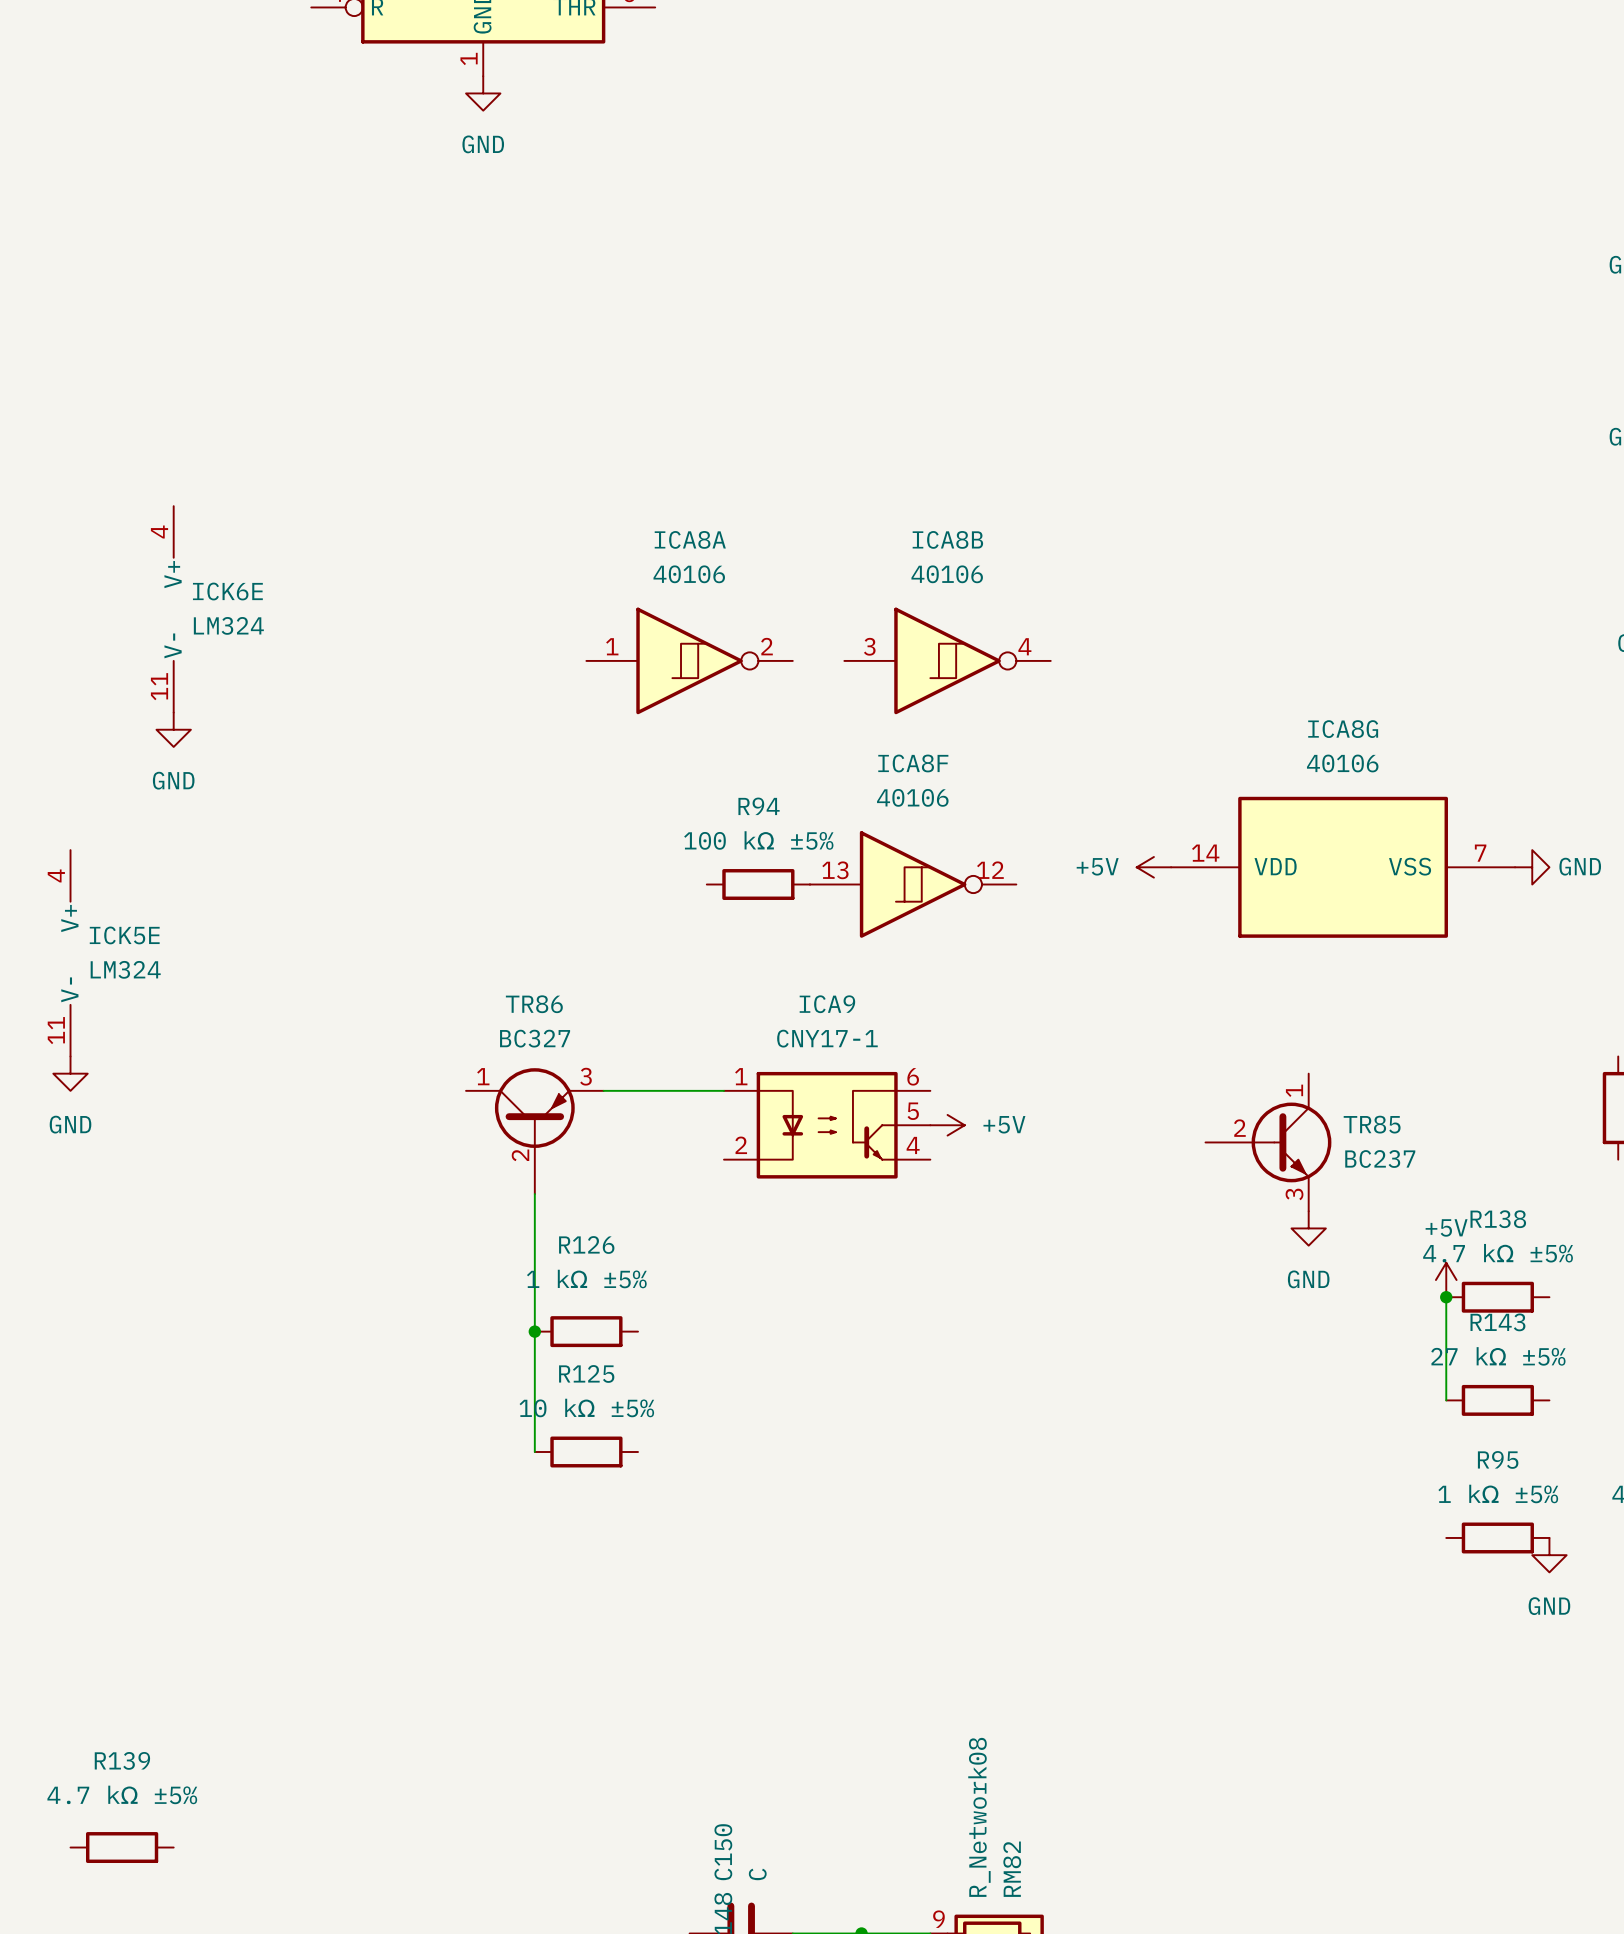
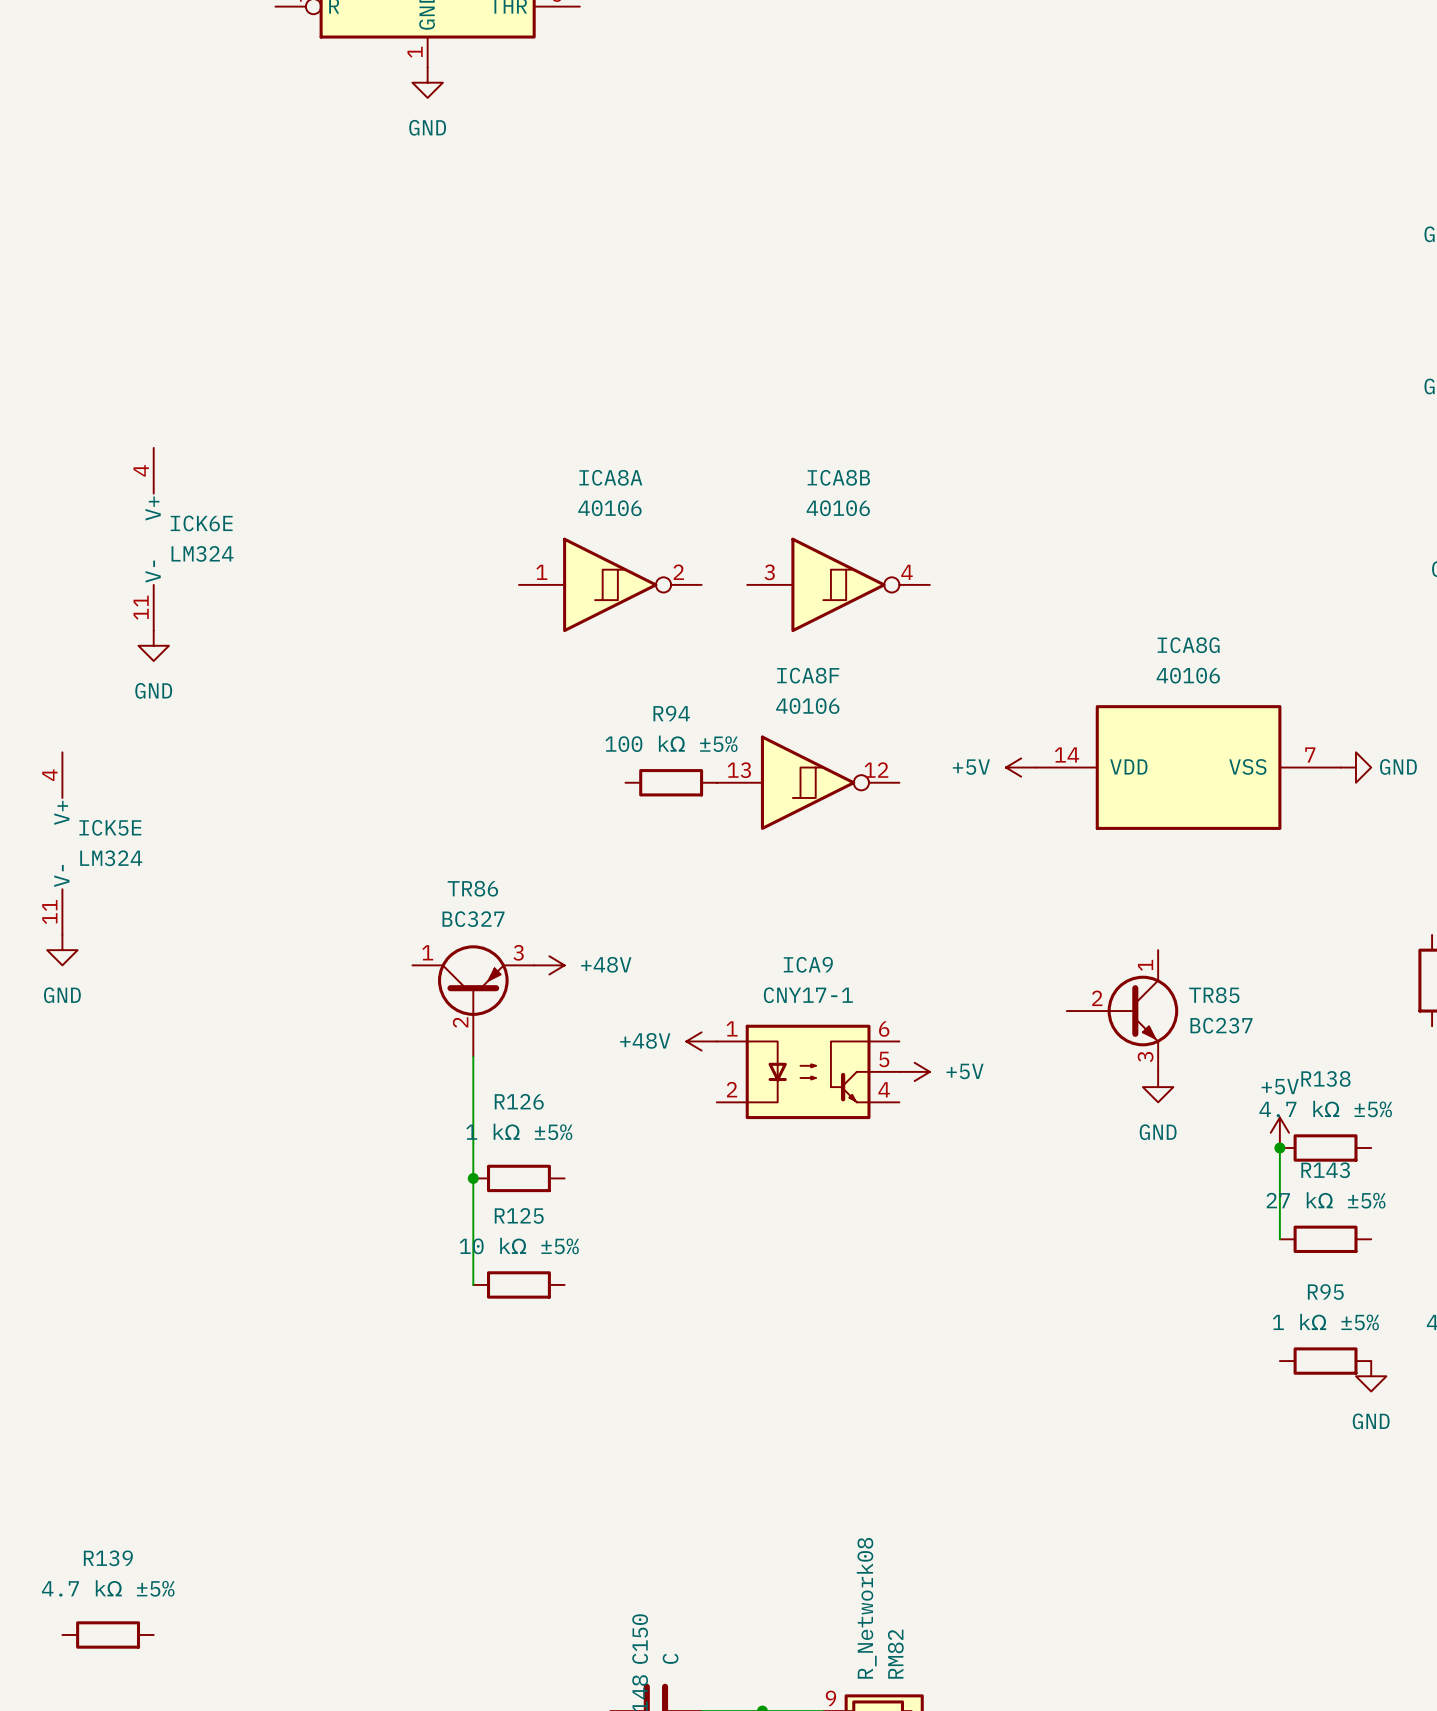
wire: (603, 1090) (723, 1090) -> none
power symbol: none -> +48V (549, 965)
ICA9 position: (827, 1125) -> (808, 1071)
power symbol position: +5V (947, 1125) -> +5V (914, 1071)
power symbol: none -> +48V (701, 1041)

